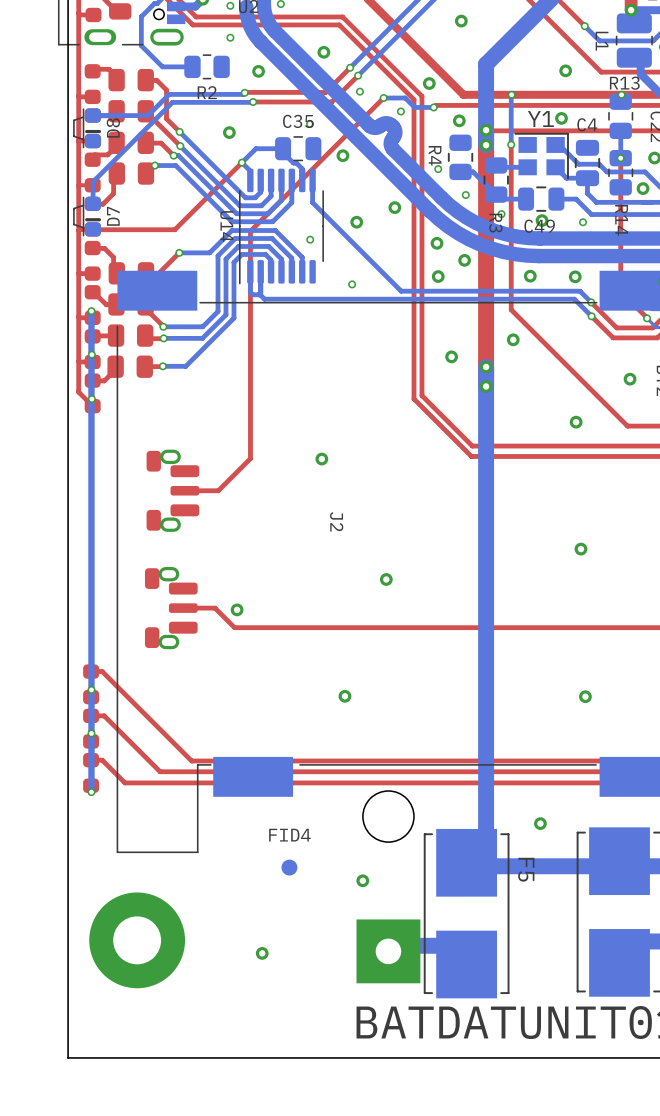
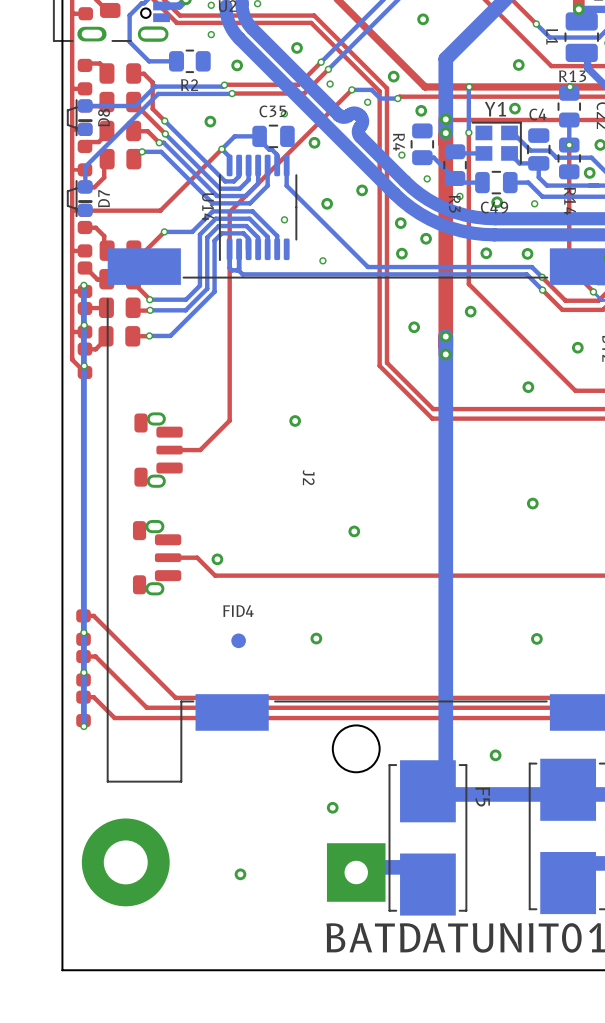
FID4 position: (289, 867) -> (238, 640)

